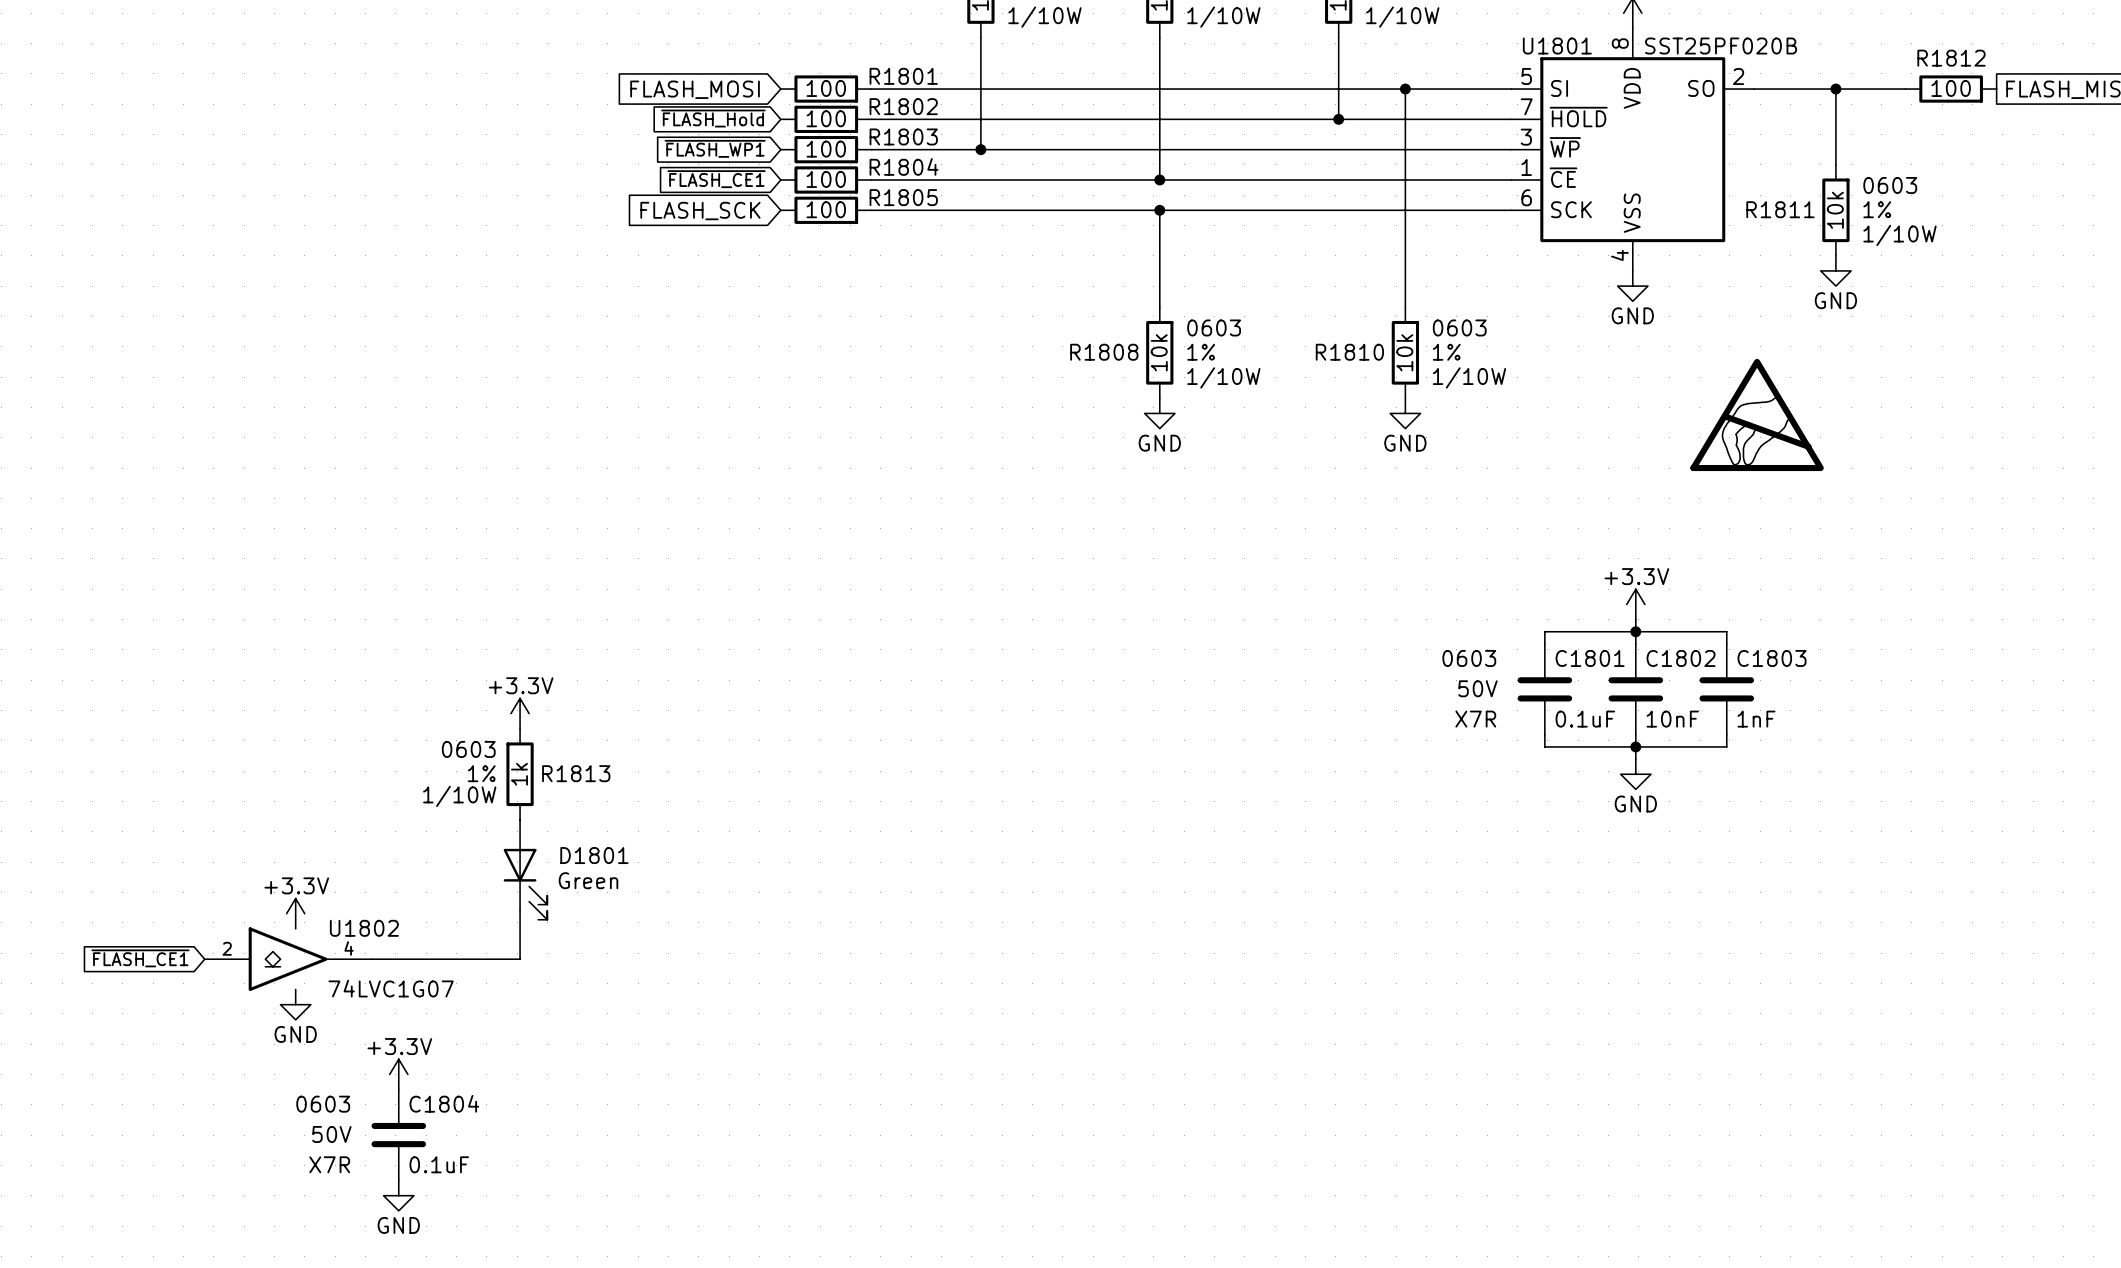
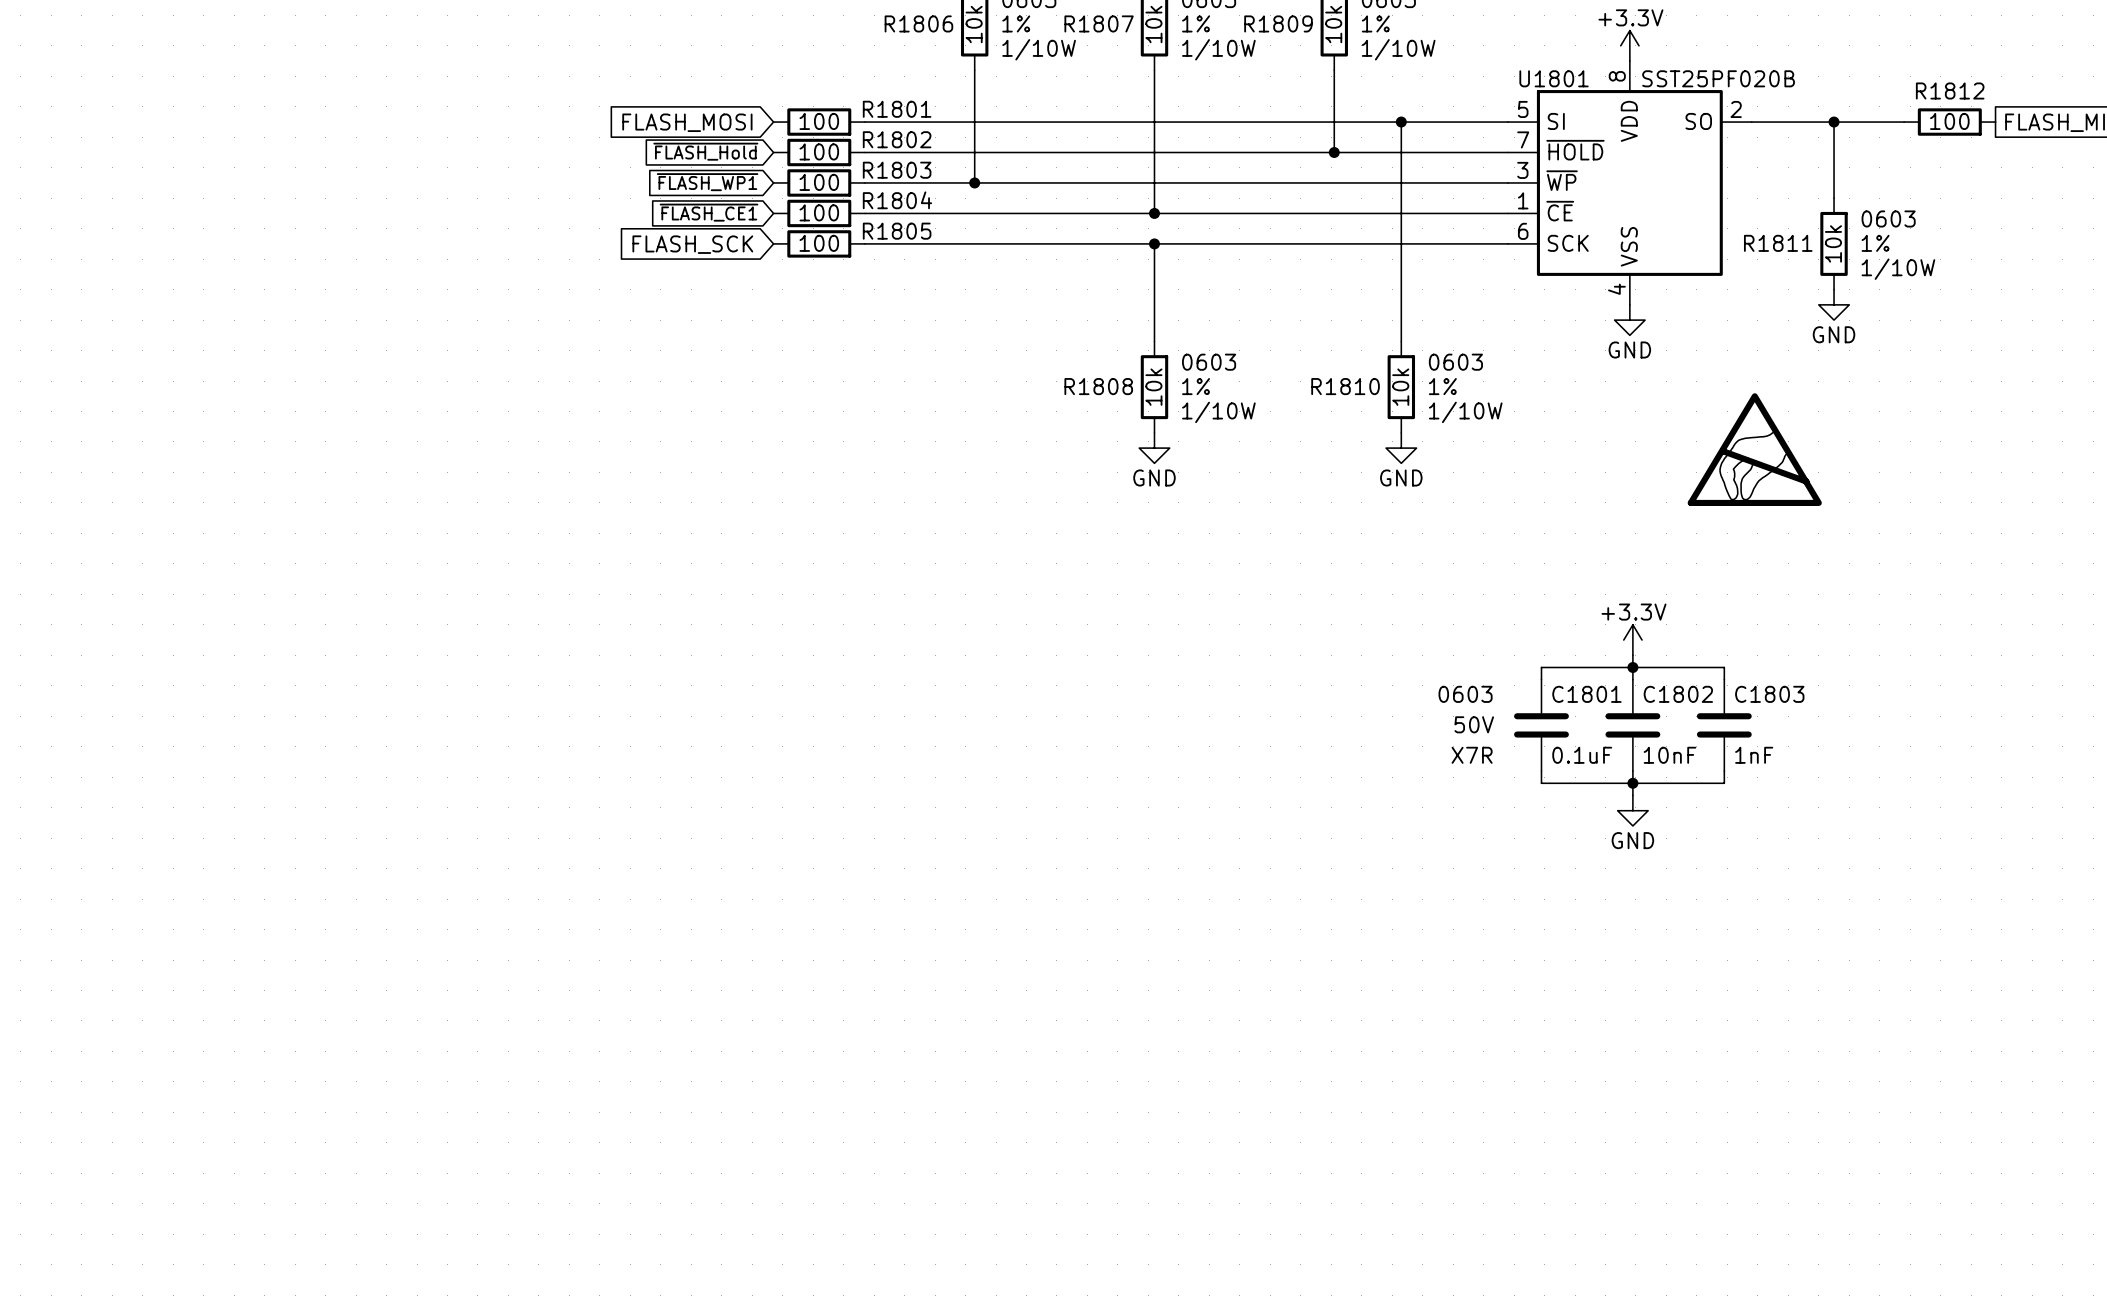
power symbol: +3.3V (520, 713) -> none
R1813: 1k (520, 774) -> none
D1801: Green (525, 869) -> none
wire: (520, 910) (520, 959) (371, 959) -> none
power symbol: +3.3V (295, 913) -> none
global label: ~{FLASH_CE1} (140, 958) -> none
U1802: 74LVC1G07 (288, 959) -> none
power symbol: GND (295, 1004) -> none
power symbol: +3.3V (398, 1074) -> none
C1804: 0.1uF (398, 1135) -> none
power symbol: GND (398, 1195) -> none

